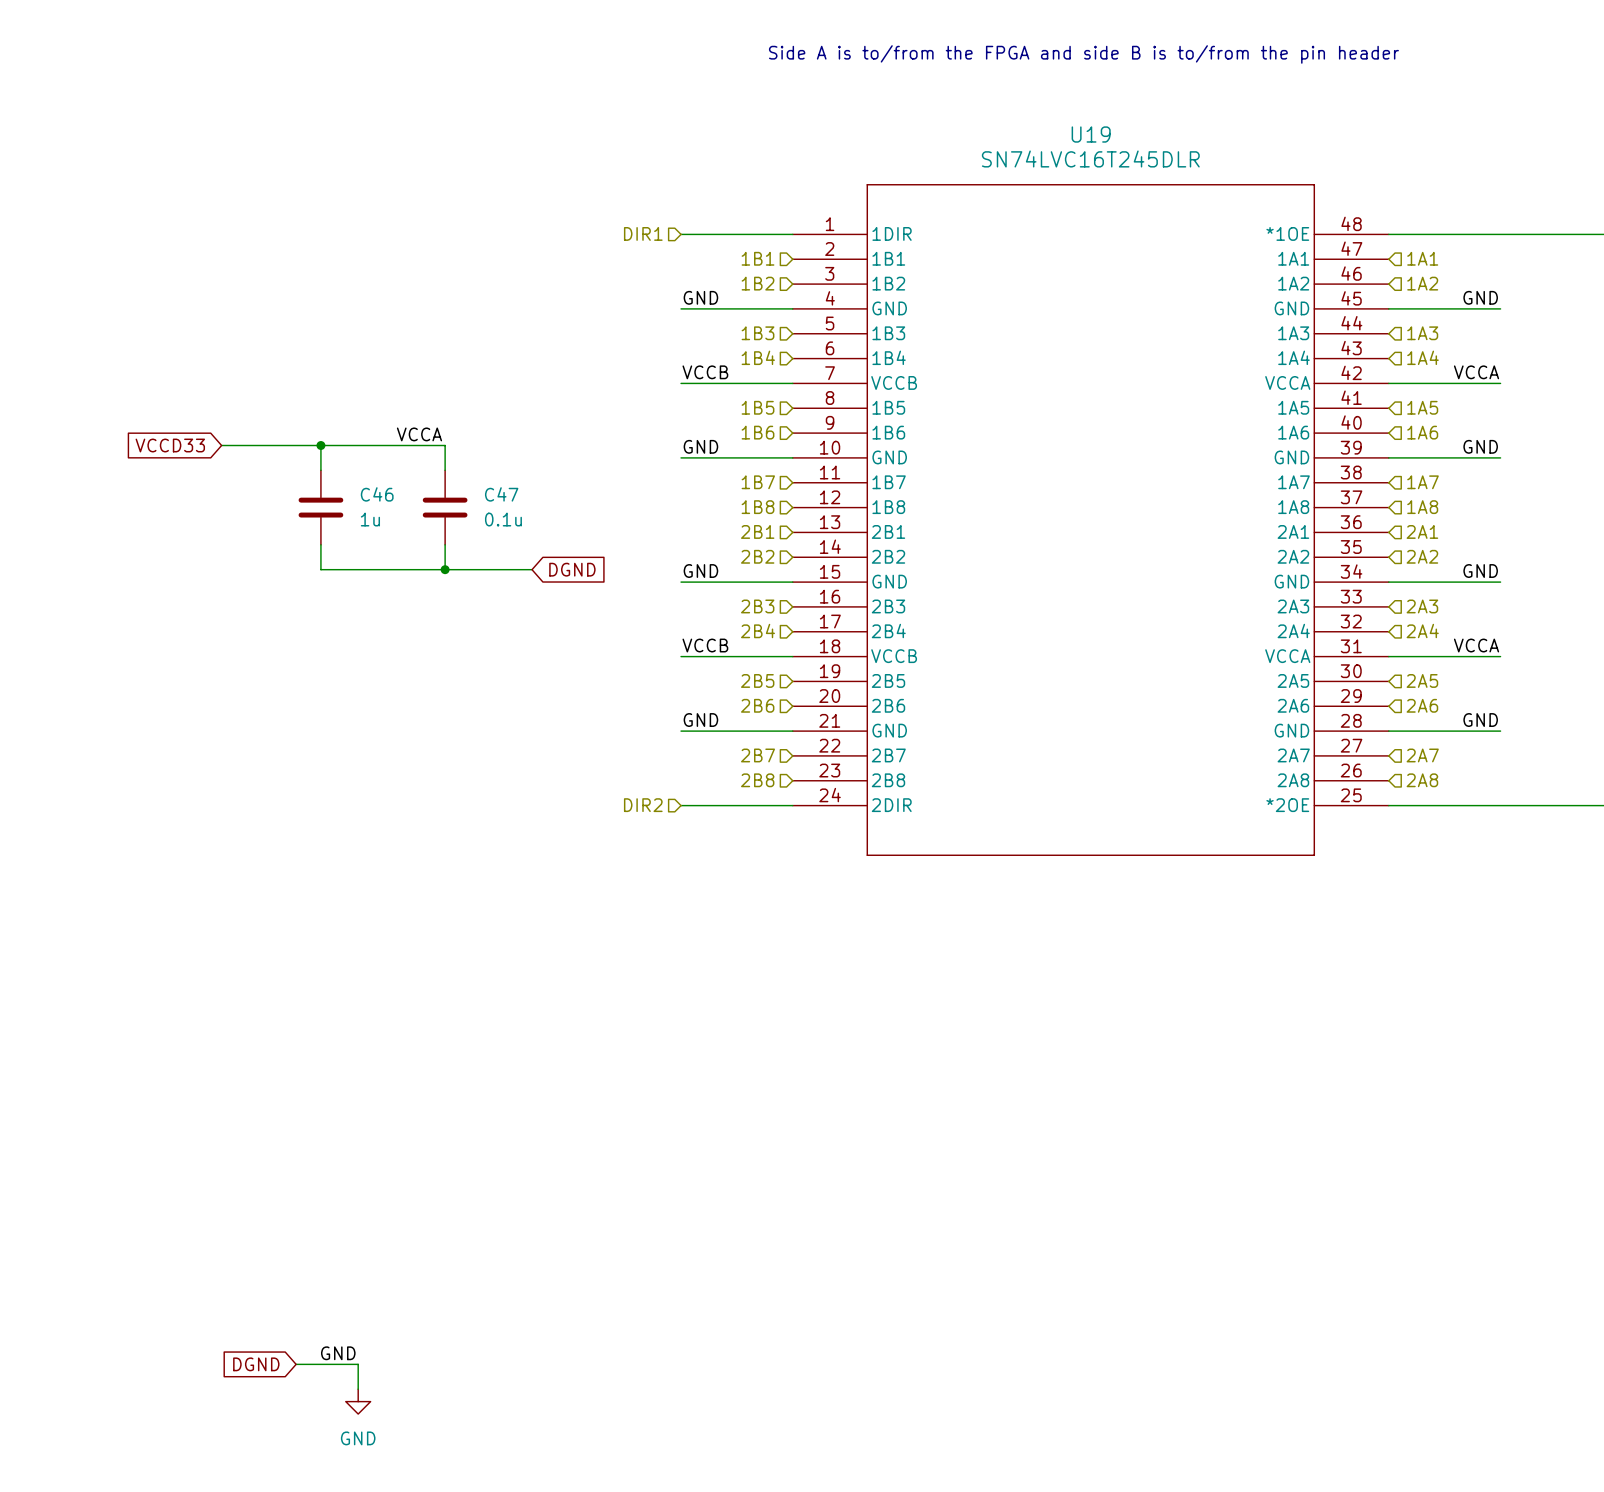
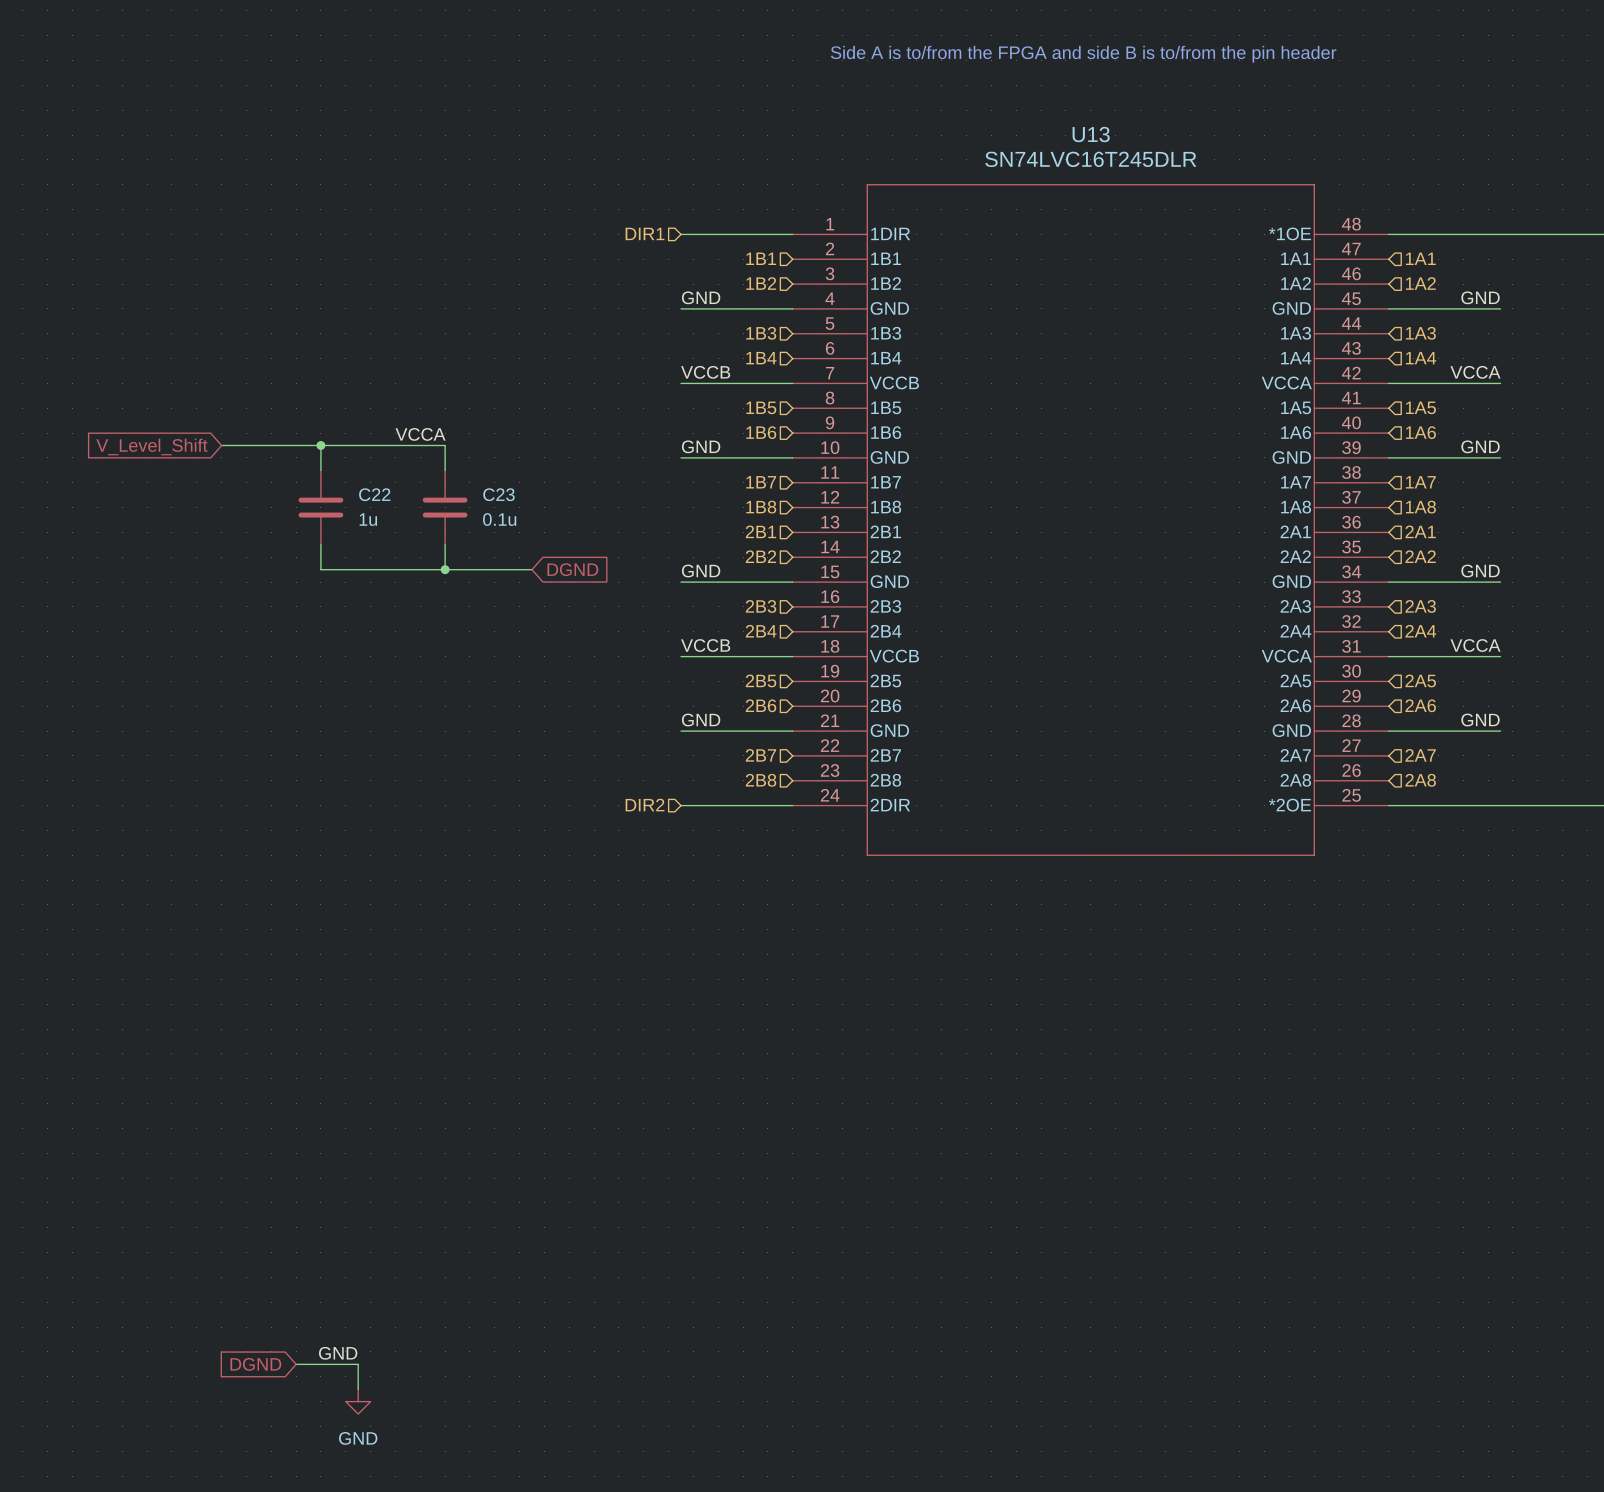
U19 name: U19 (1091, 134) -> U13 (1091, 134)
global label: VCCD33 (170, 445) -> V_Level_Shift (151, 446)
C46 name: C46 (377, 494) -> C22 (374, 494)
C47 name: C47 (501, 494) -> C23 (498, 494)

